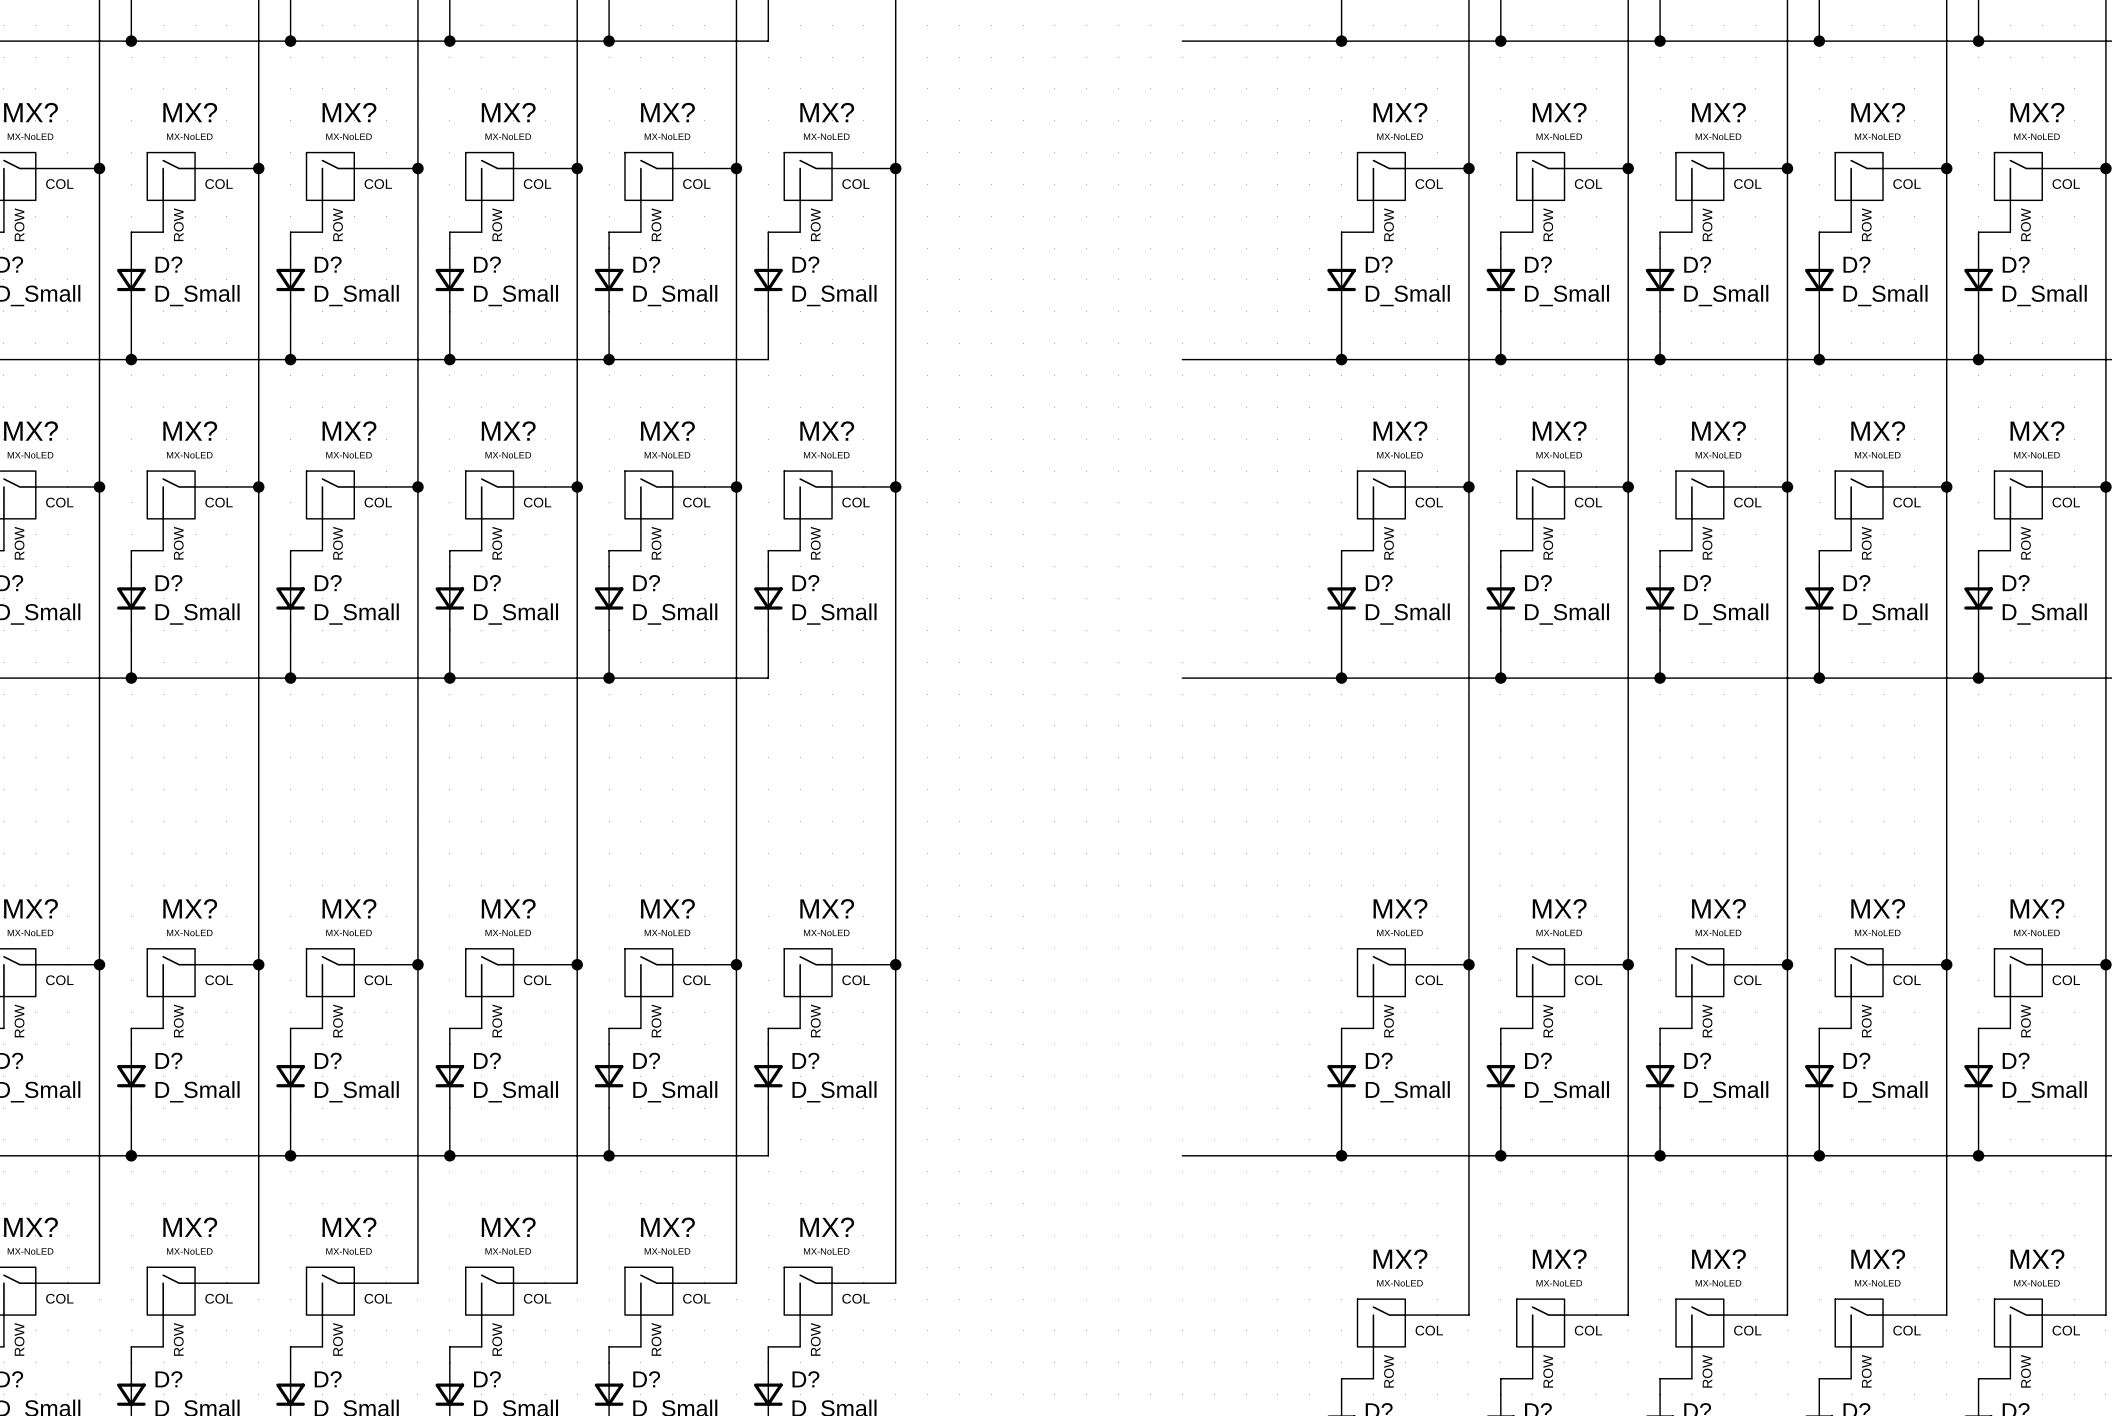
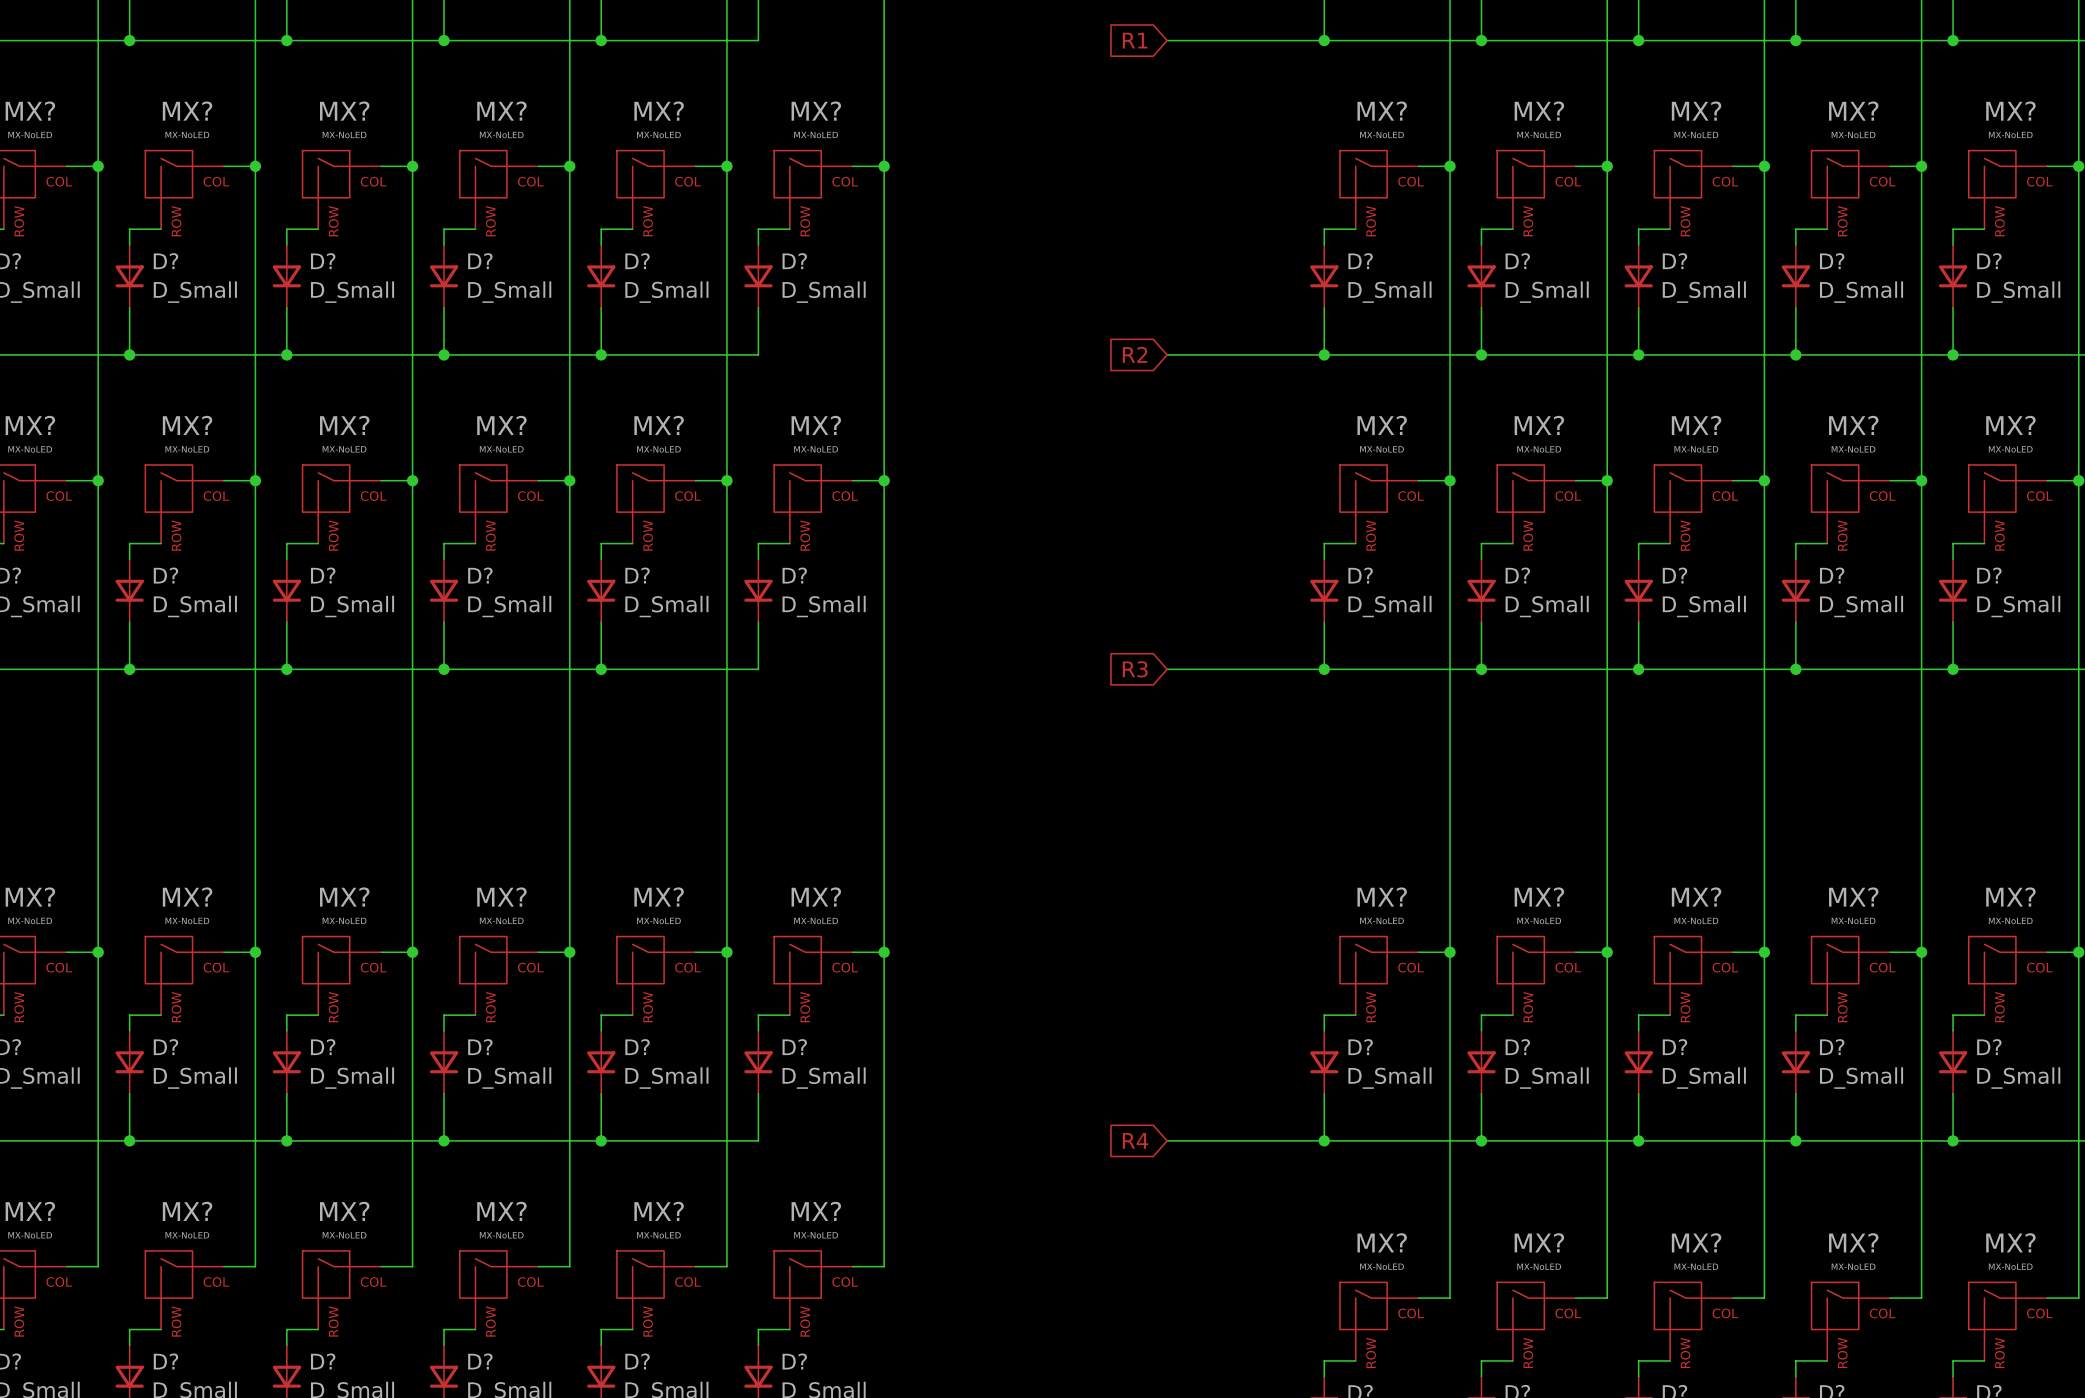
global label: none -> R1 (1135, 40)
global label: none -> R2 (1135, 354)
global label: none -> R3 (1135, 669)
global label: none -> R4 (1135, 1140)

